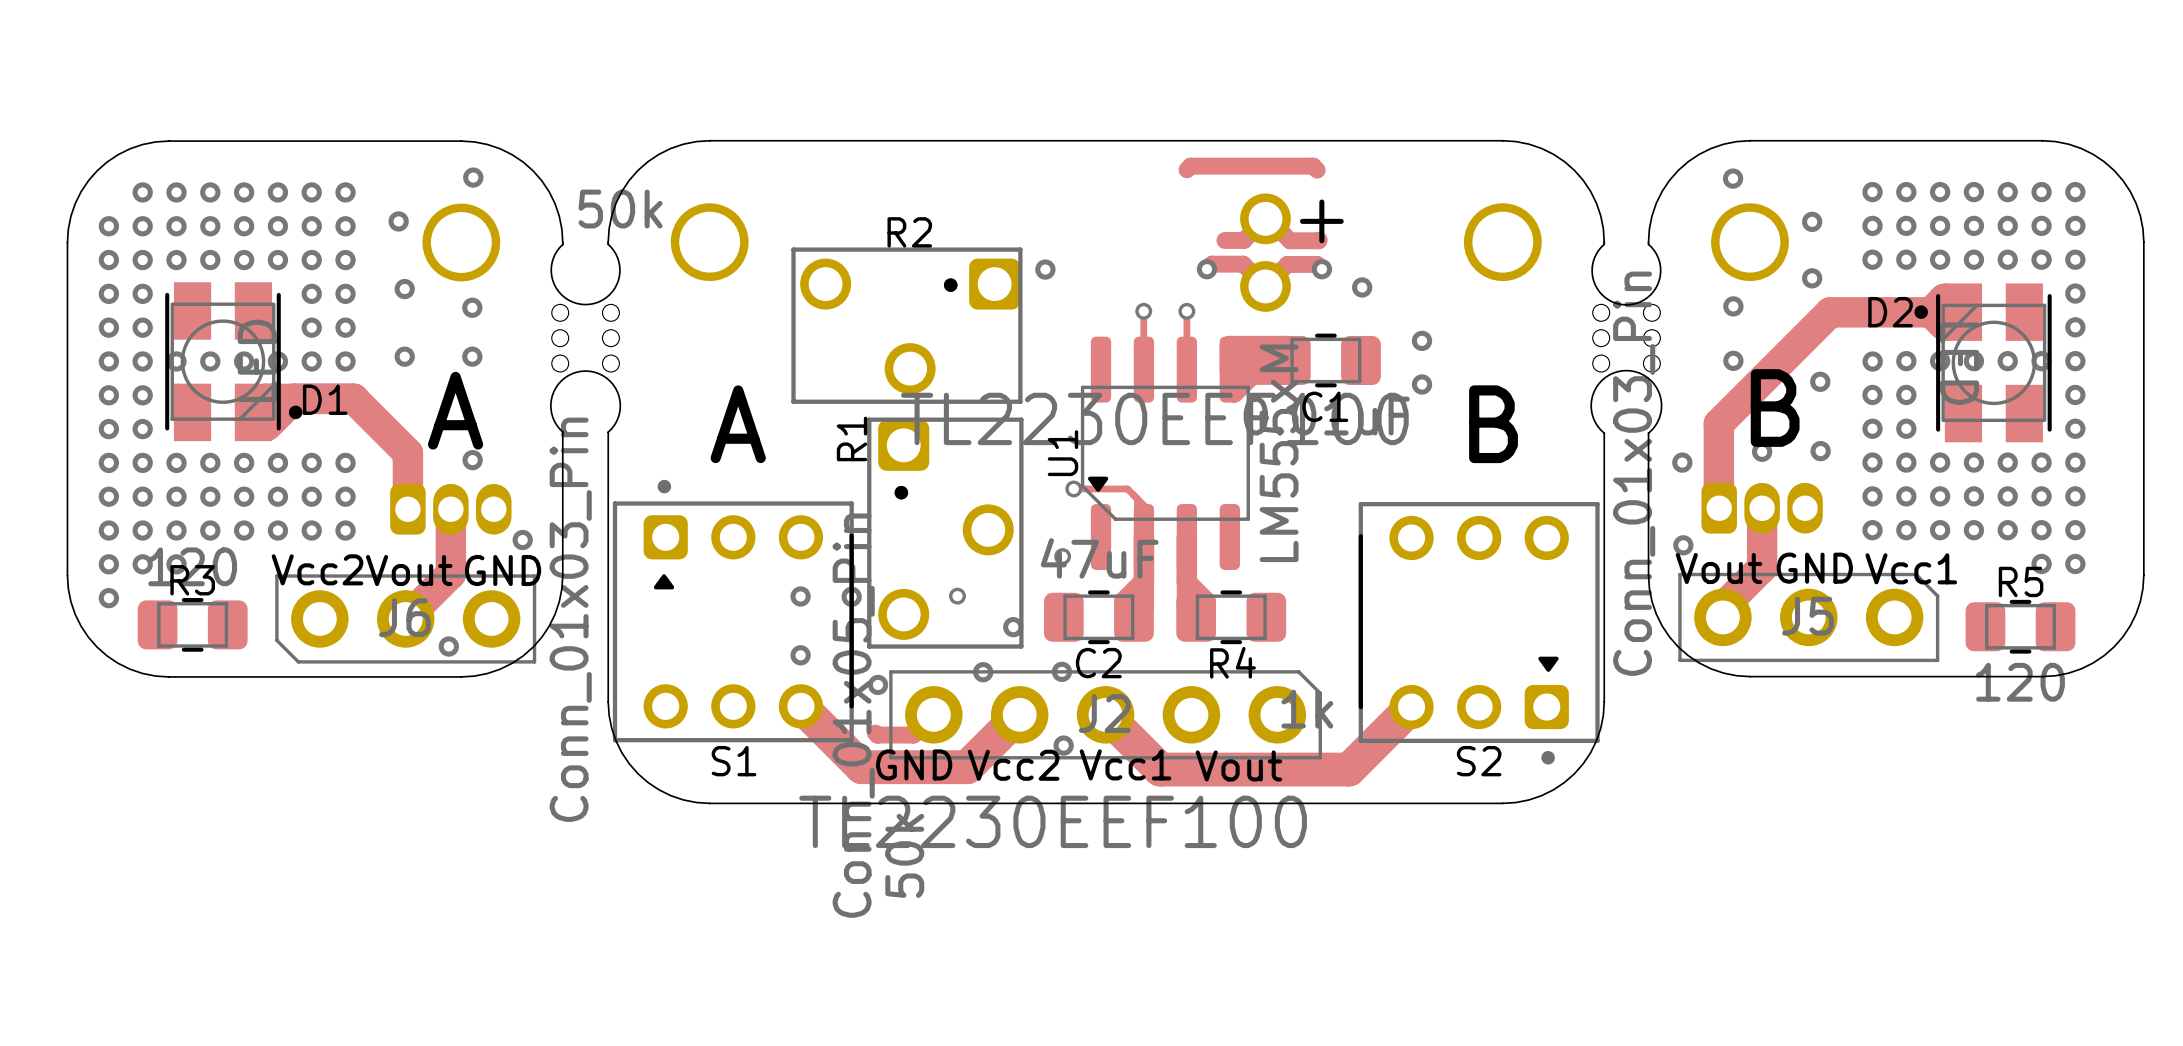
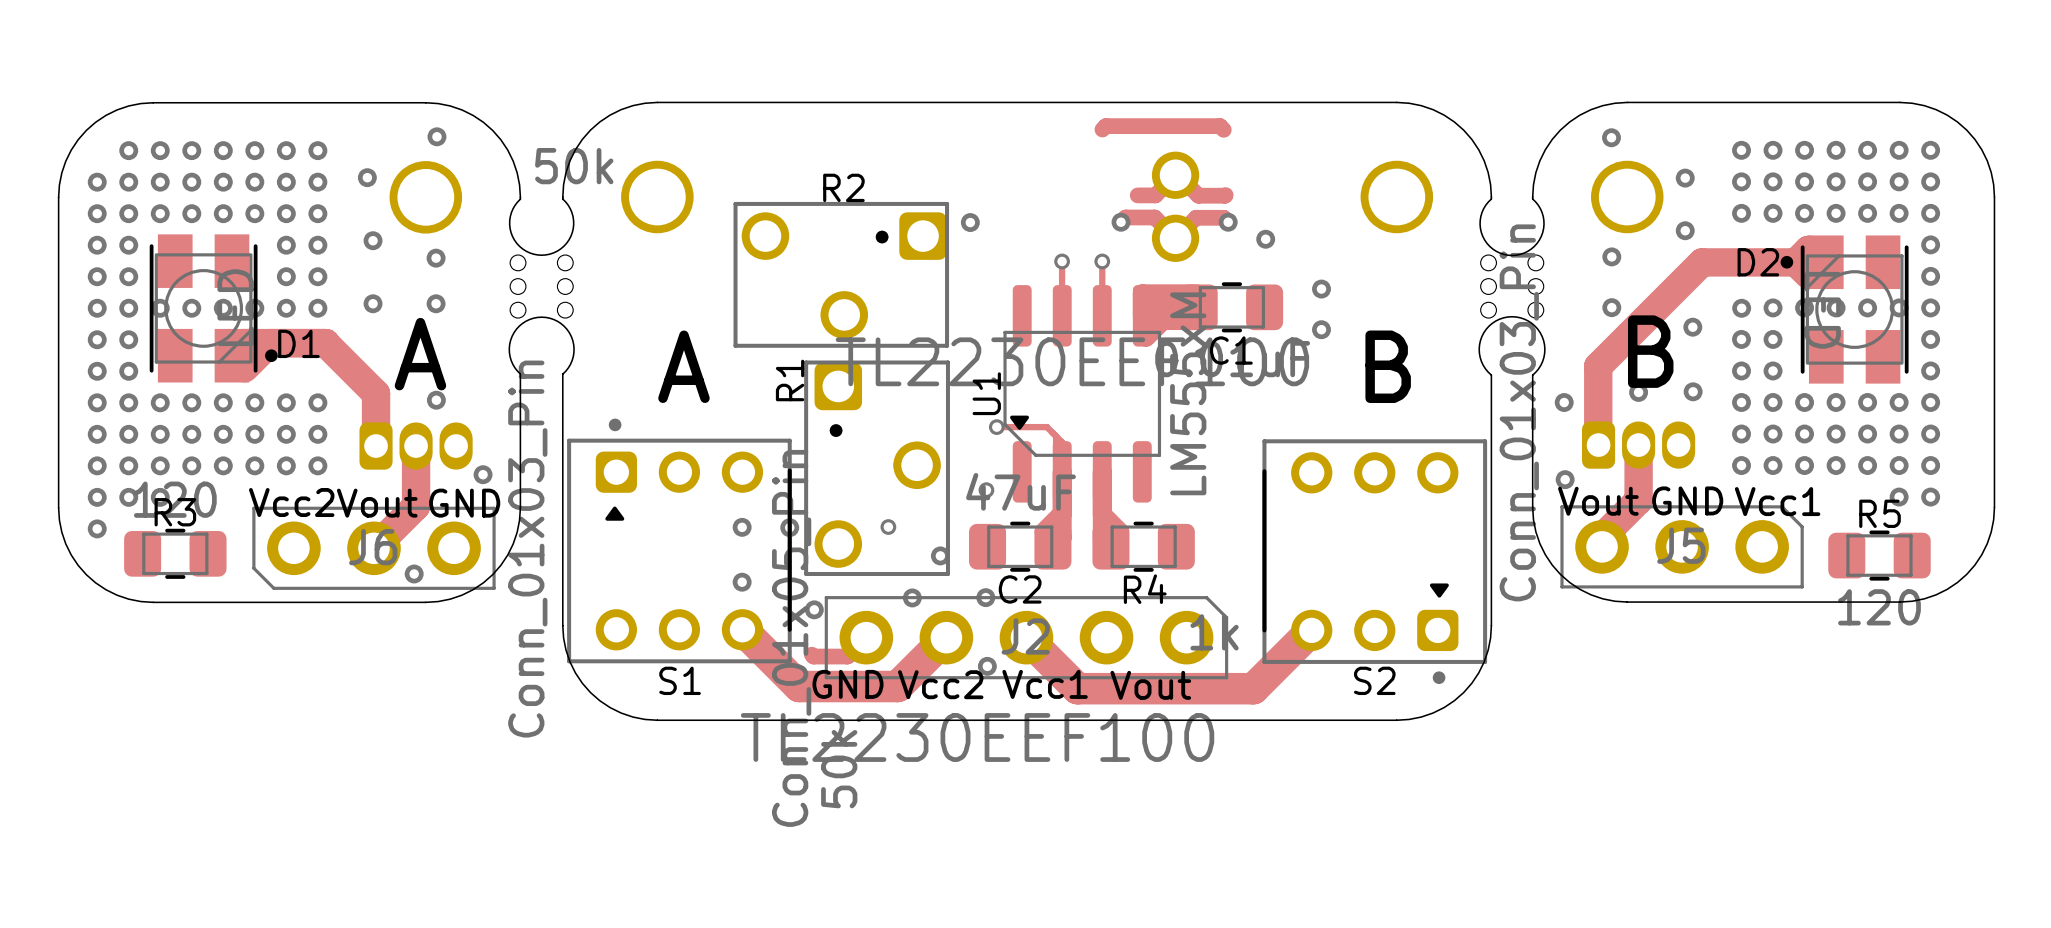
text: + (1321, 221) -> none

